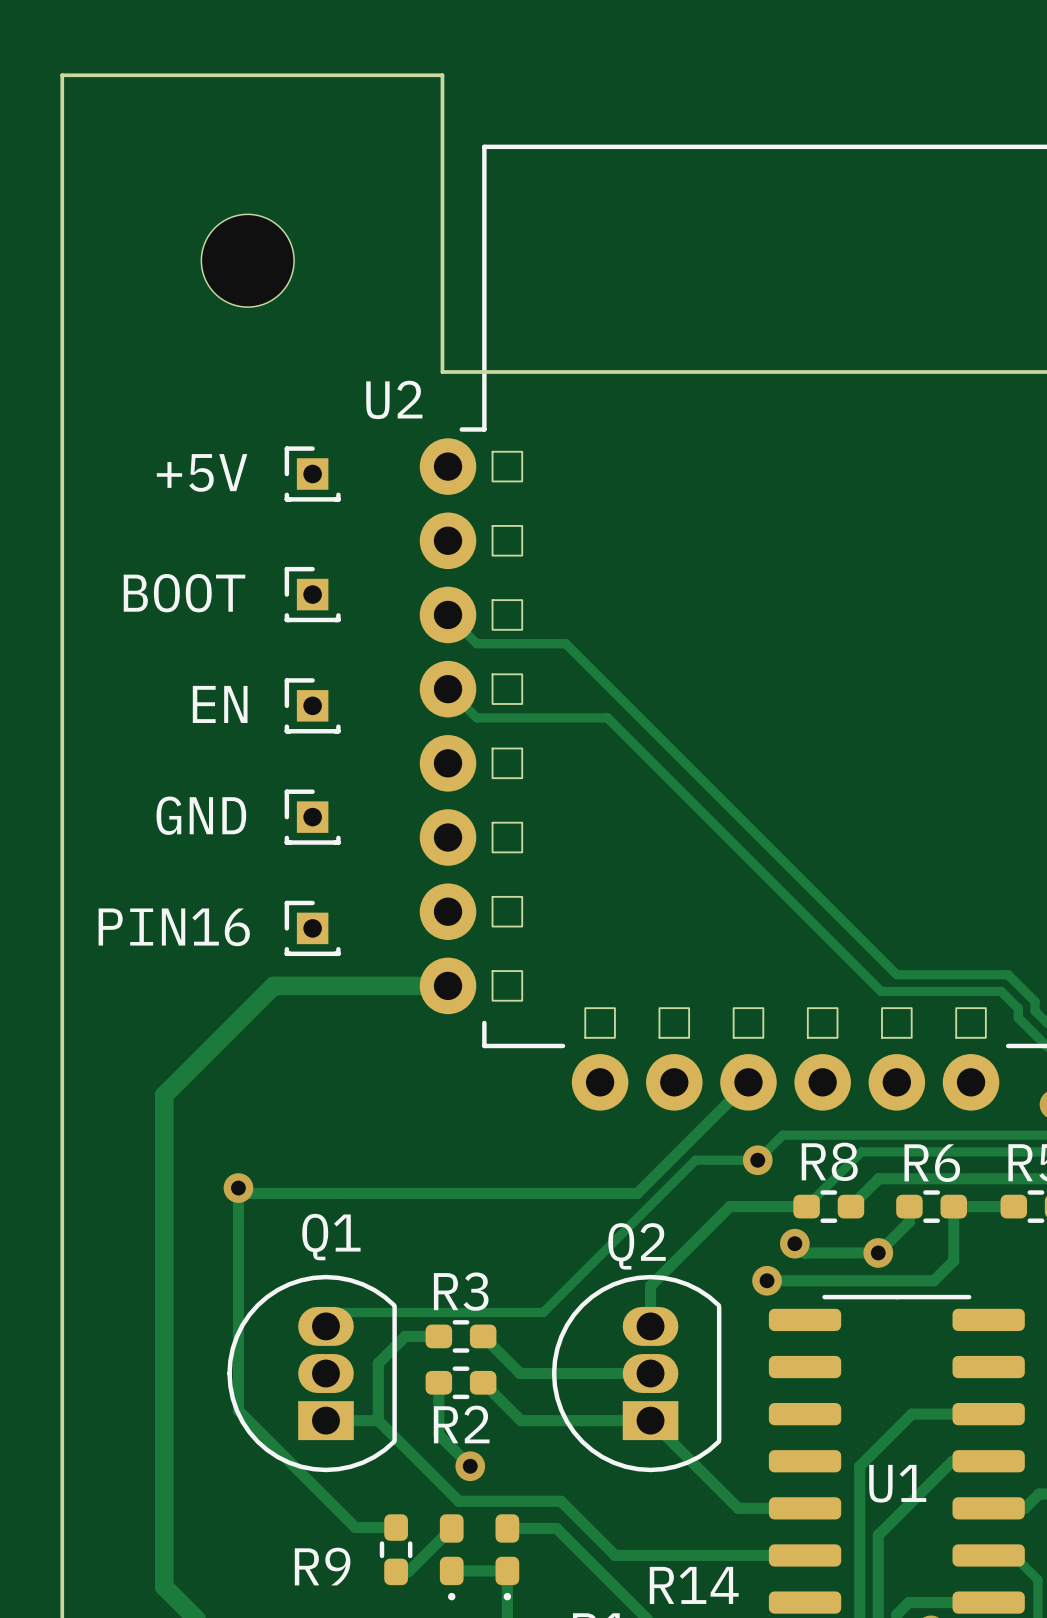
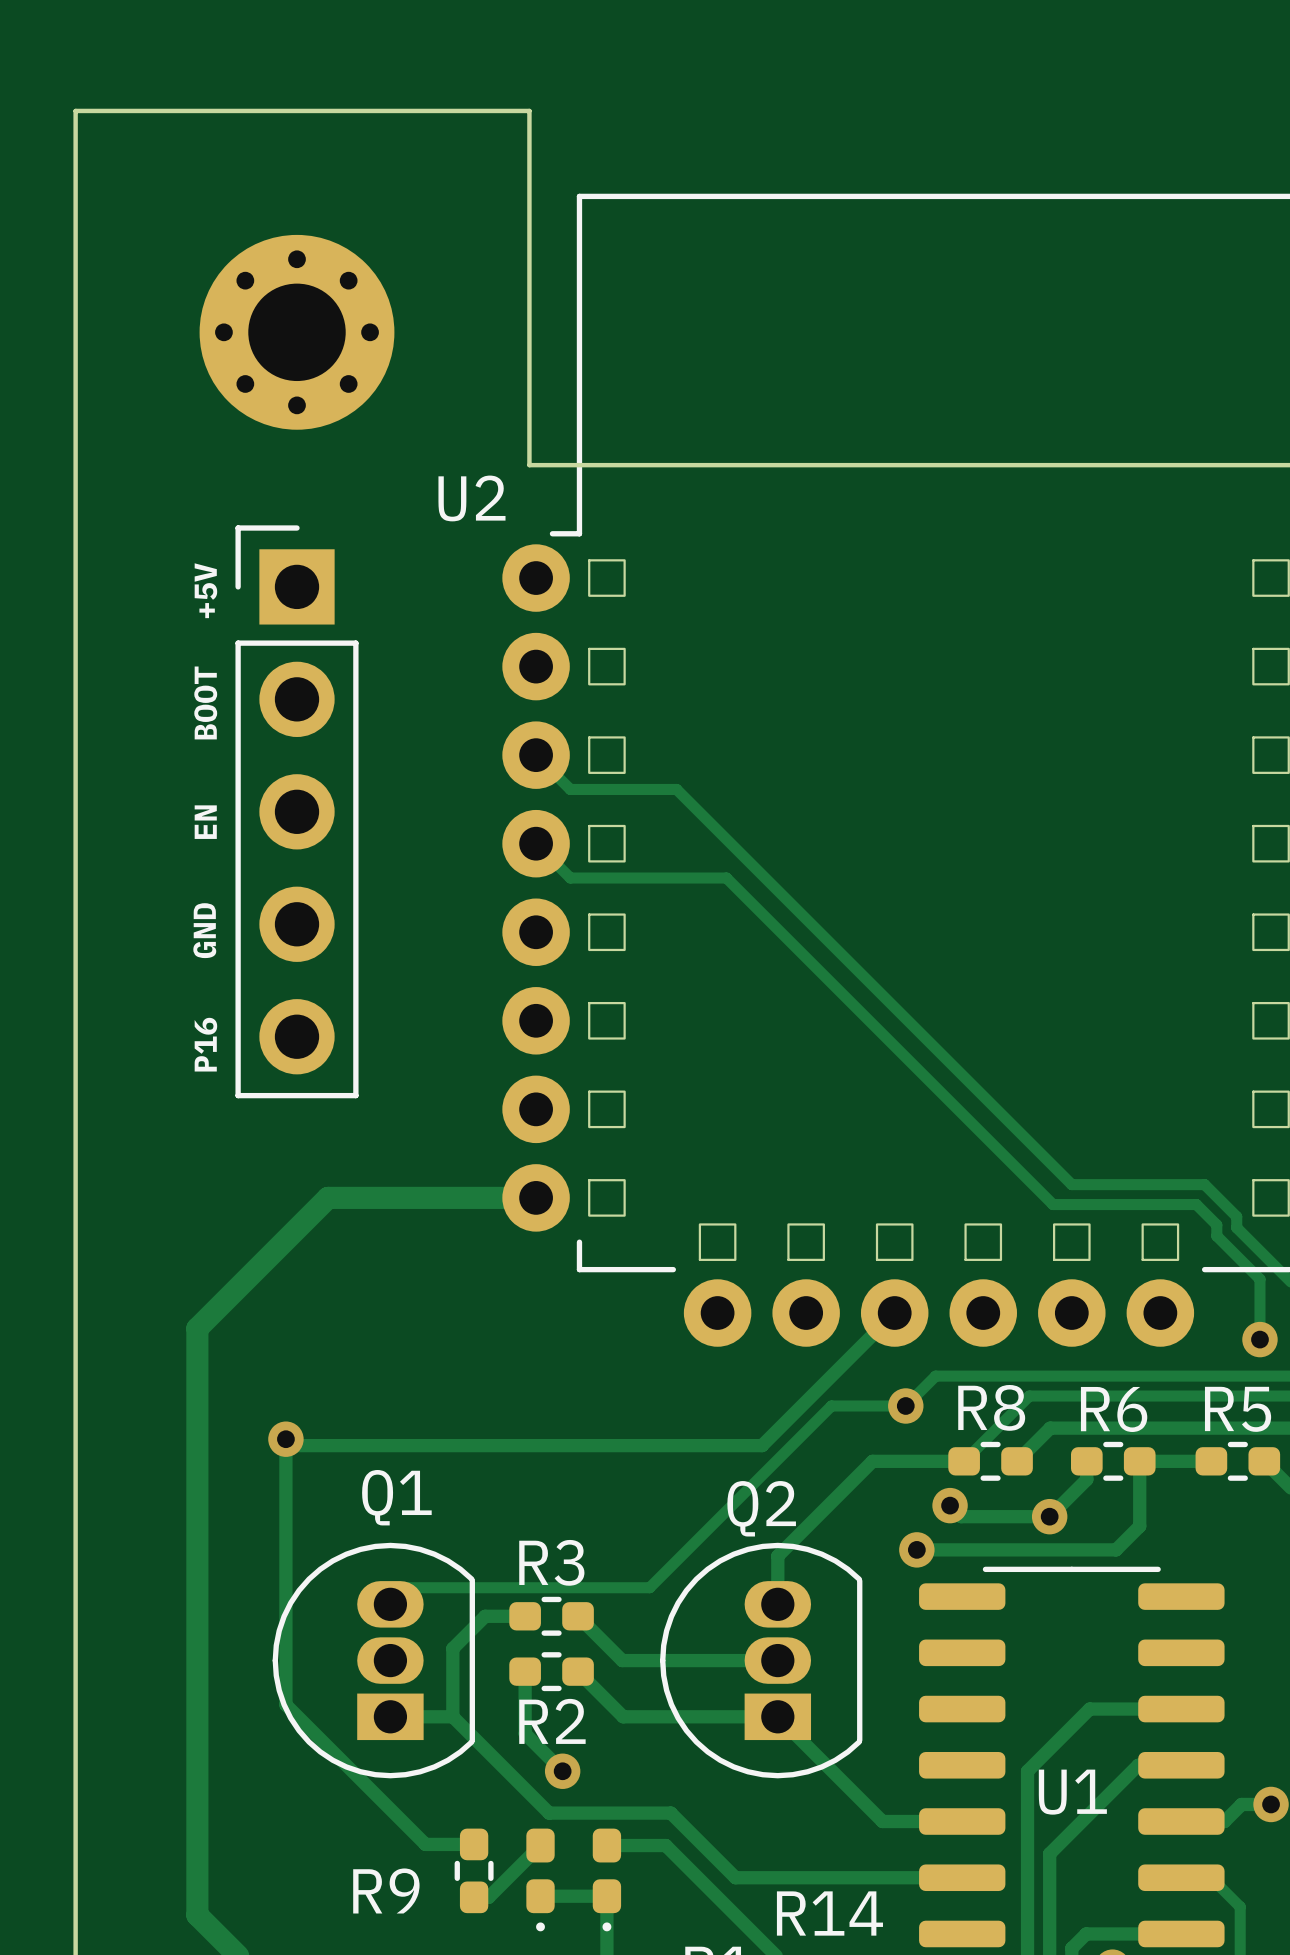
part footprint: [201, 214, 295, 308] -> [199, 234, 395, 430]
+5V: (312, 474) -> none
text: none -> +5V (205, 590)
text: none -> BOOT (205, 702)
BOOT: (312, 594) -> none
part: none -> (297, 811)
text: none -> EN (205, 822)
EN: (312, 705) -> none
text: none -> GND (204, 930)
GND: (312, 817) -> none
text: none -> P16 (205, 1044)
PIN16: (312, 928) -> none

